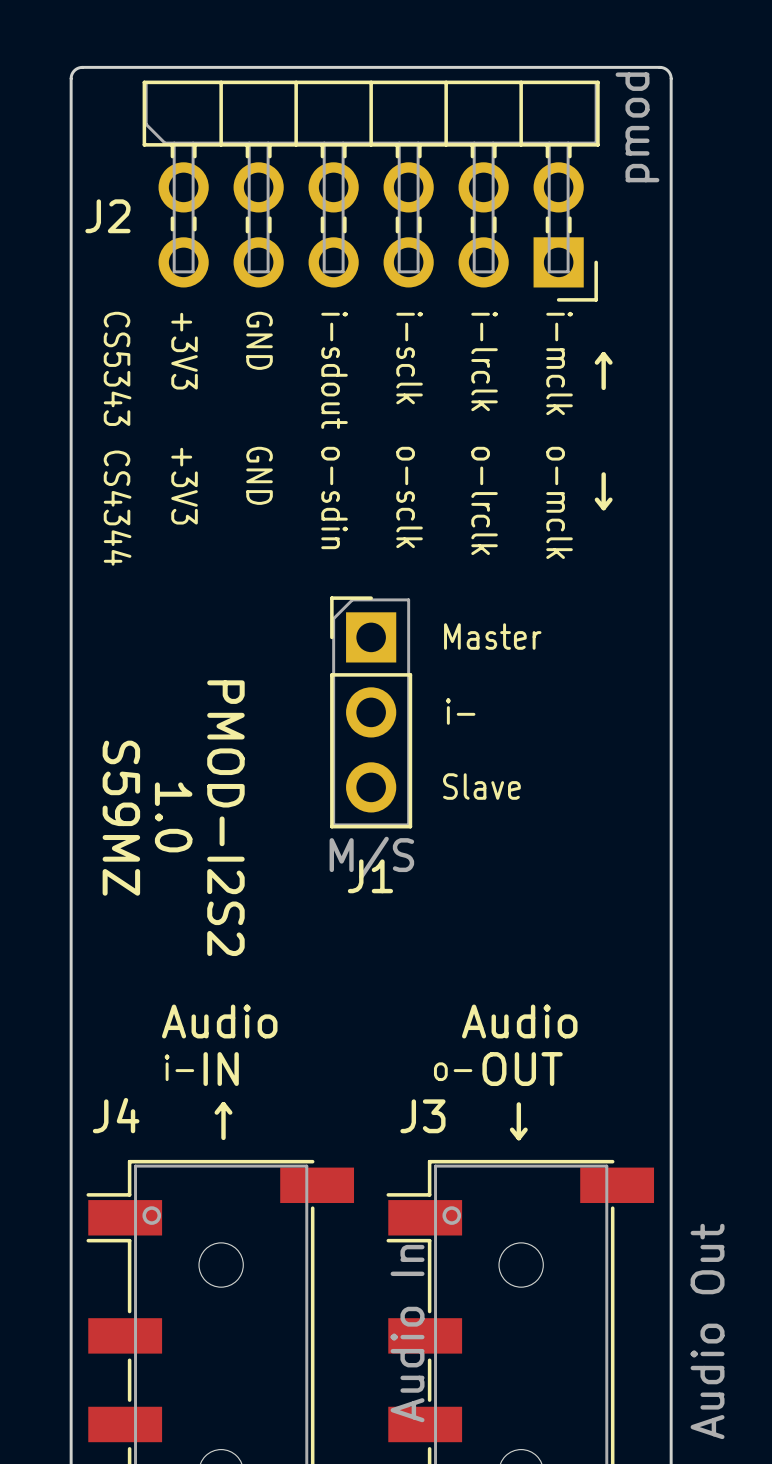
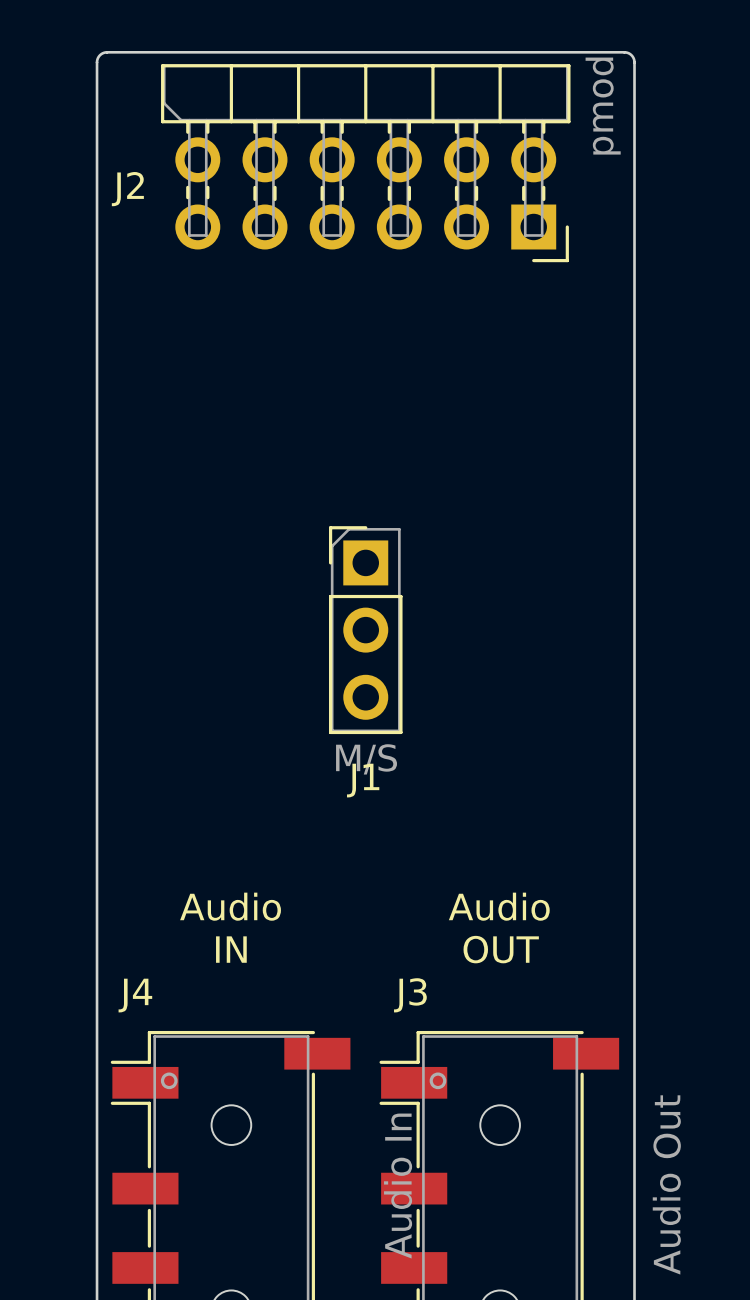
text: GND (259, 340) -> none
text: +3V3 (184, 351) -> none
text: i-sclk (409, 358) -> none
text: i-lrclk (484, 361) -> none
text: i-mclk (559, 363) -> none
text: CS5343 (117, 368) -> none
text: i-sdout (334, 370) -> none
text: ↑ (603, 371) -> none
text: GND (259, 475) -> none
text: +3V3 (184, 486) -> none
text: ↑ (603, 491) -> none
text: o-sdin (334, 497) -> none
text: o-sclk (409, 497) -> none
text: o-lrclk (484, 500) -> none
text: o-mclk (559, 502) -> none
text: CS4344 (117, 508) -> none
text: Master (492, 636) -> none
text: i- (460, 711) -> none
text: Slave (481, 786) -> none
text: 1.0 (173, 817) -> none
text: S59MZ (121, 818) -> none
text: PMOD-I2S2 (225, 818) -> none
text: i- (179, 1067) -> none
text: o- (453, 1071) -> none
text: ↑ (223, 1121) -> none
text: ↑ (518, 1121) -> none

